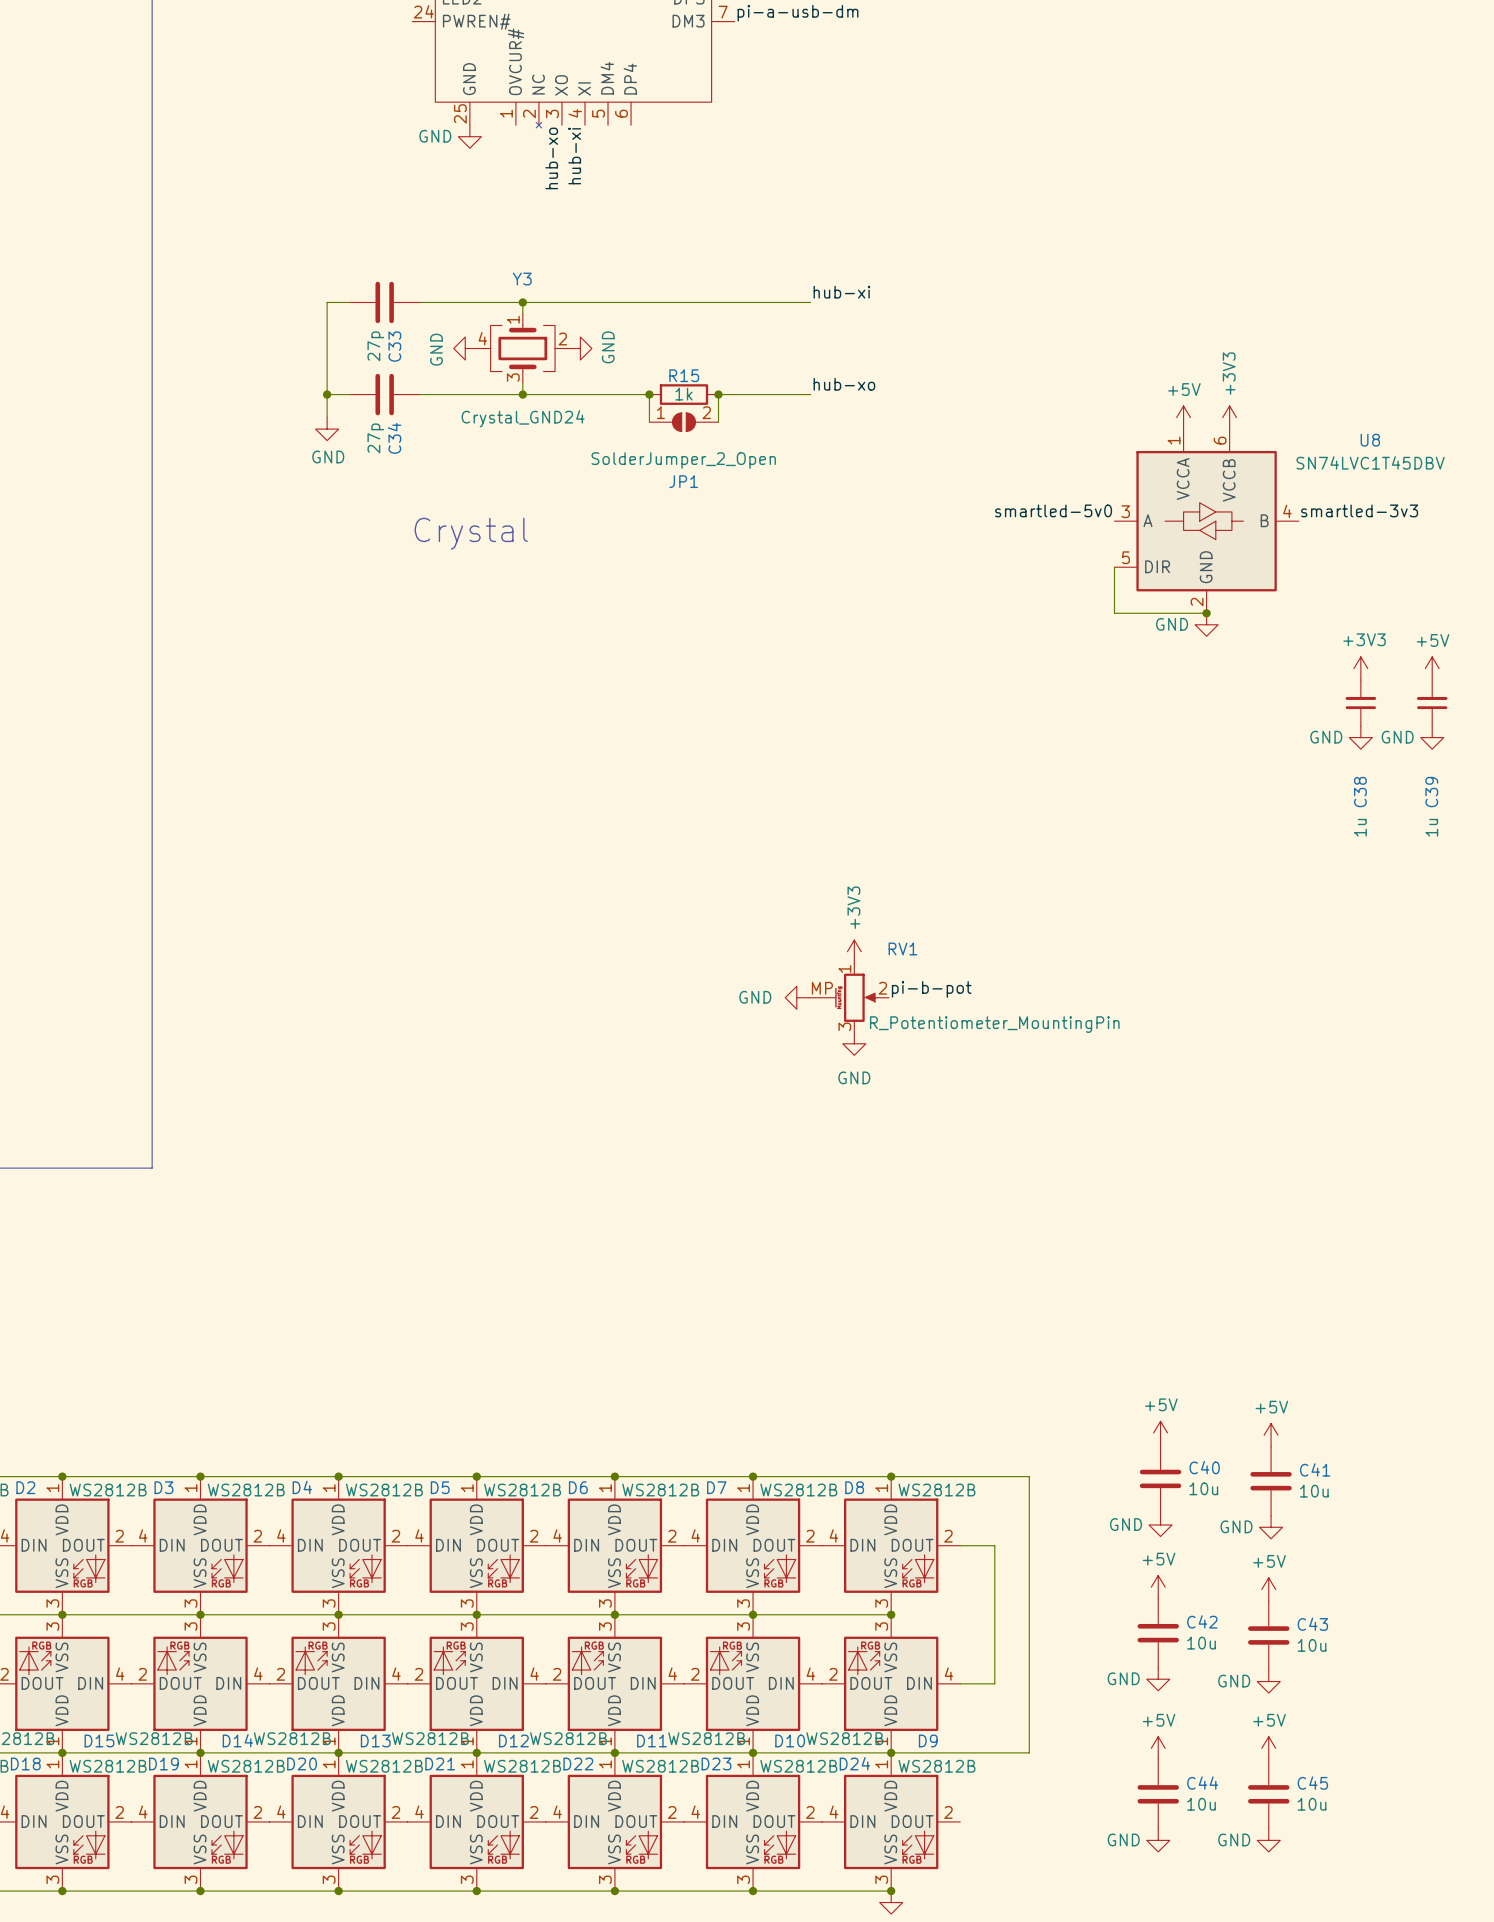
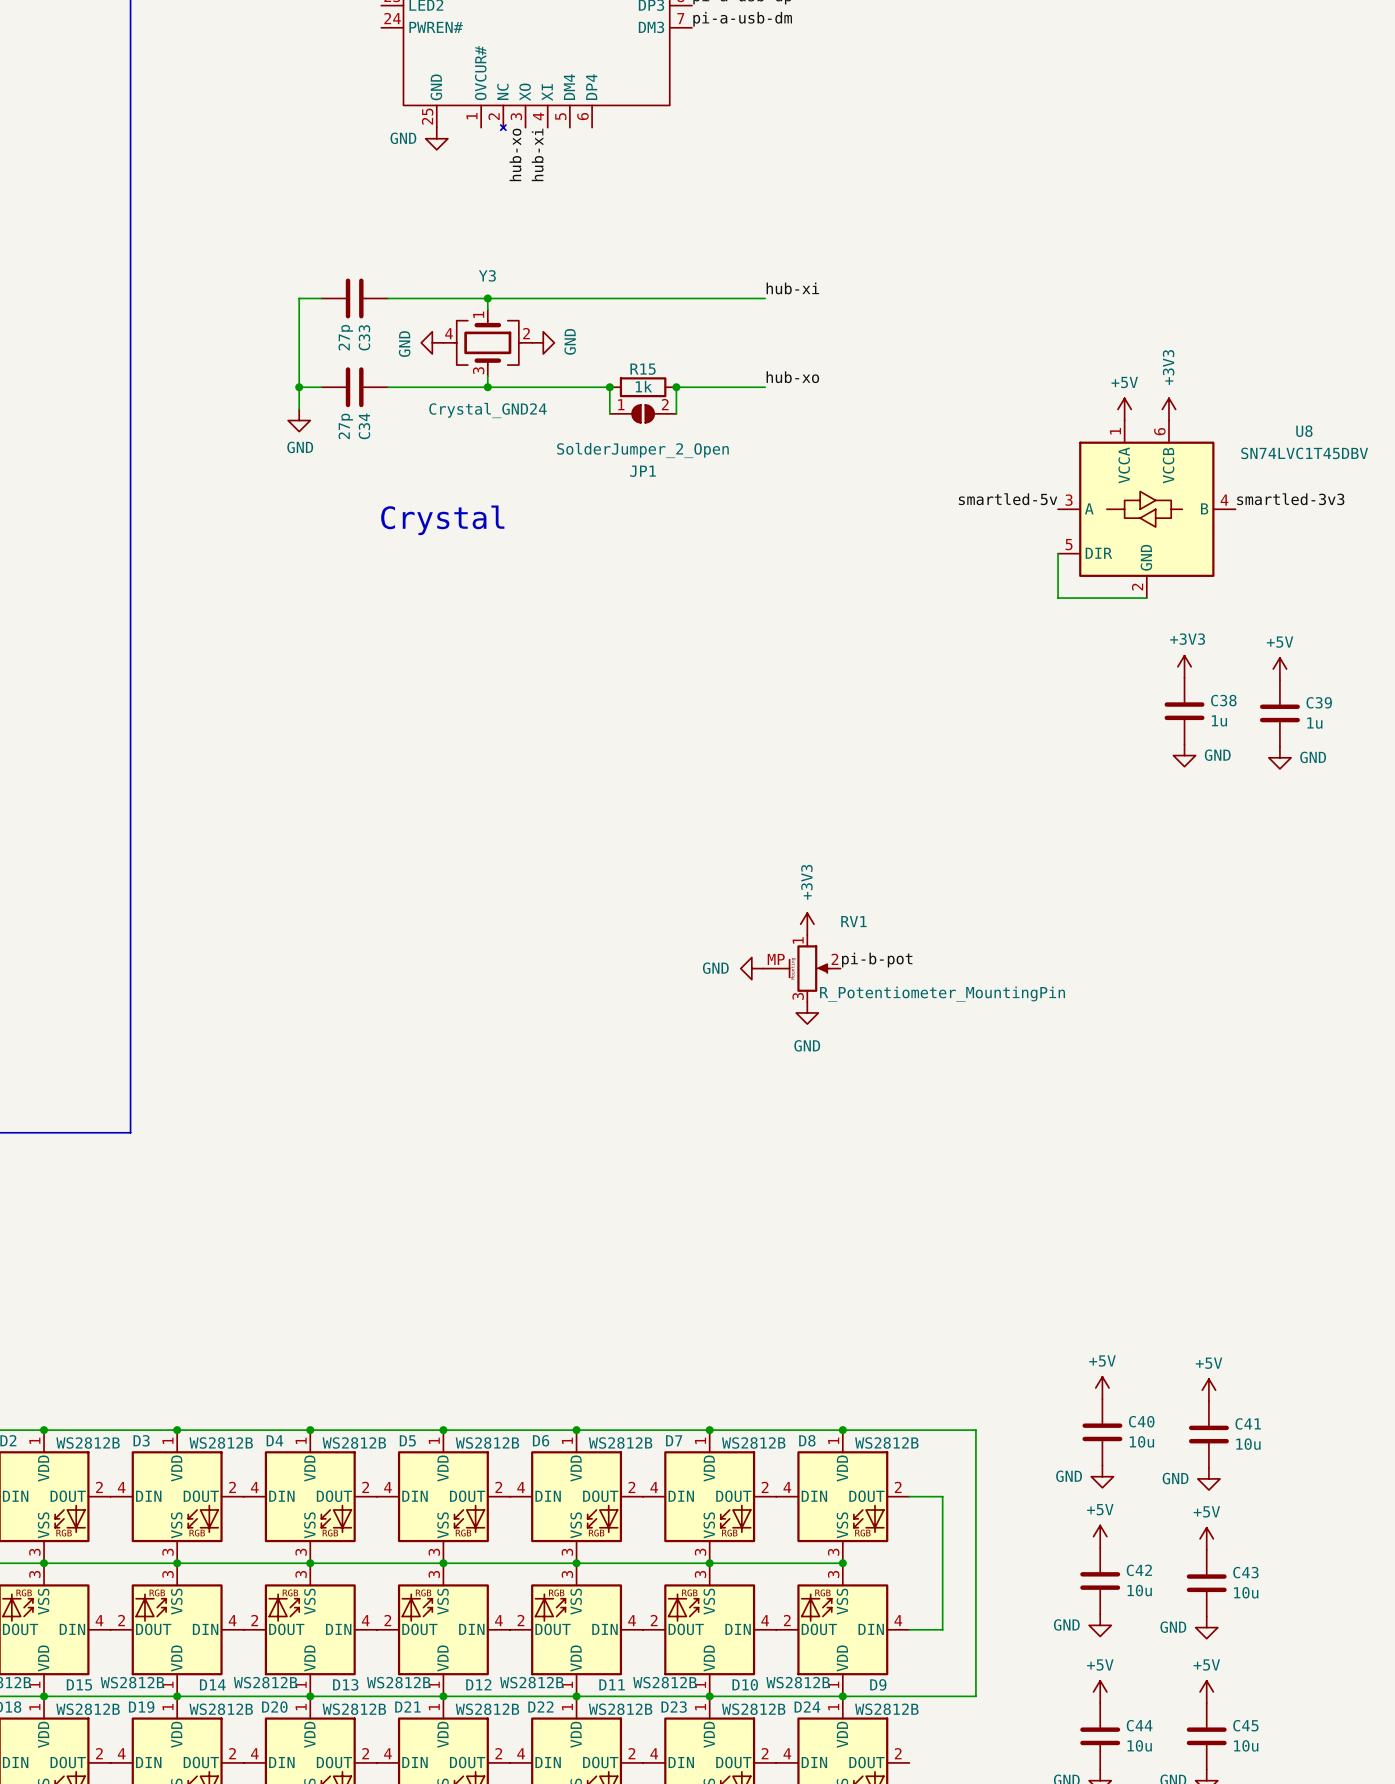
label: smartled-5v0 (1053, 510) -> smartled-5v (1008, 499)
junction: (1206, 613) -> none
power symbol: GND (1206, 624) -> none
power symbol position: +3V3 (1360, 668) -> +3V3 (1184, 666)
power symbol position: +5V (1432, 668) -> +5V (1279, 669)
C38 symbol: [1345, 680, 1377, 727] -> [1164, 677, 1205, 745]
C39 symbol: [1416, 680, 1448, 727] -> [1259, 680, 1300, 747]
power symbol text position: GND (1326, 737) -> GND (1313, 757)
power symbol position: GND (1360, 737) -> GND (1279, 757)
power symbol: GND (1432, 737) -> none
power symbol: none -> GND (1184, 755)
C38 name position: C38 (1360, 792) -> C38 (1223, 700)
C39 name position: C39 (1431, 792) -> C39 (1319, 702)
C38 value position: 1u (1360, 827) -> 1u (1219, 720)
C39 value position: 1u (1431, 827) -> 1u (1314, 723)

